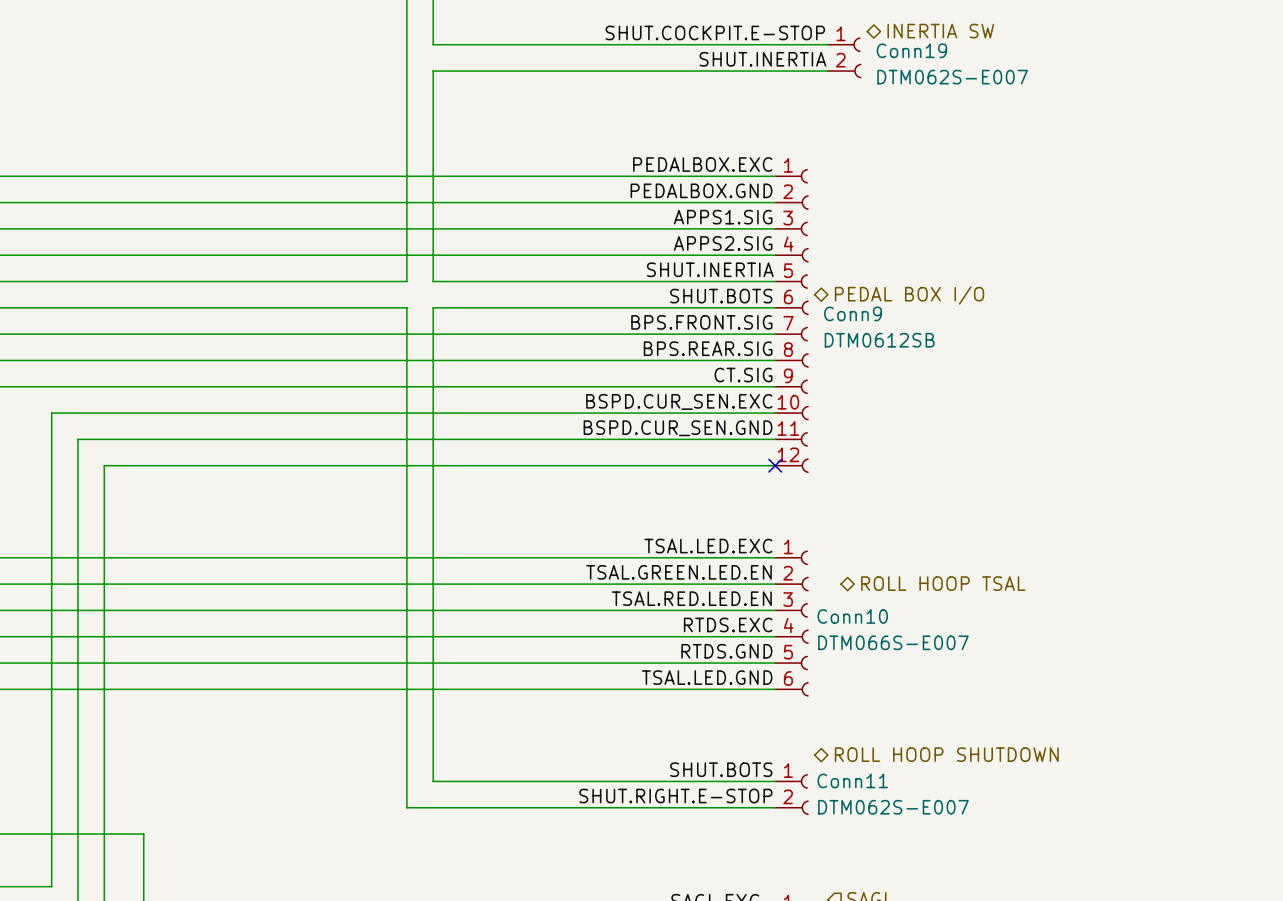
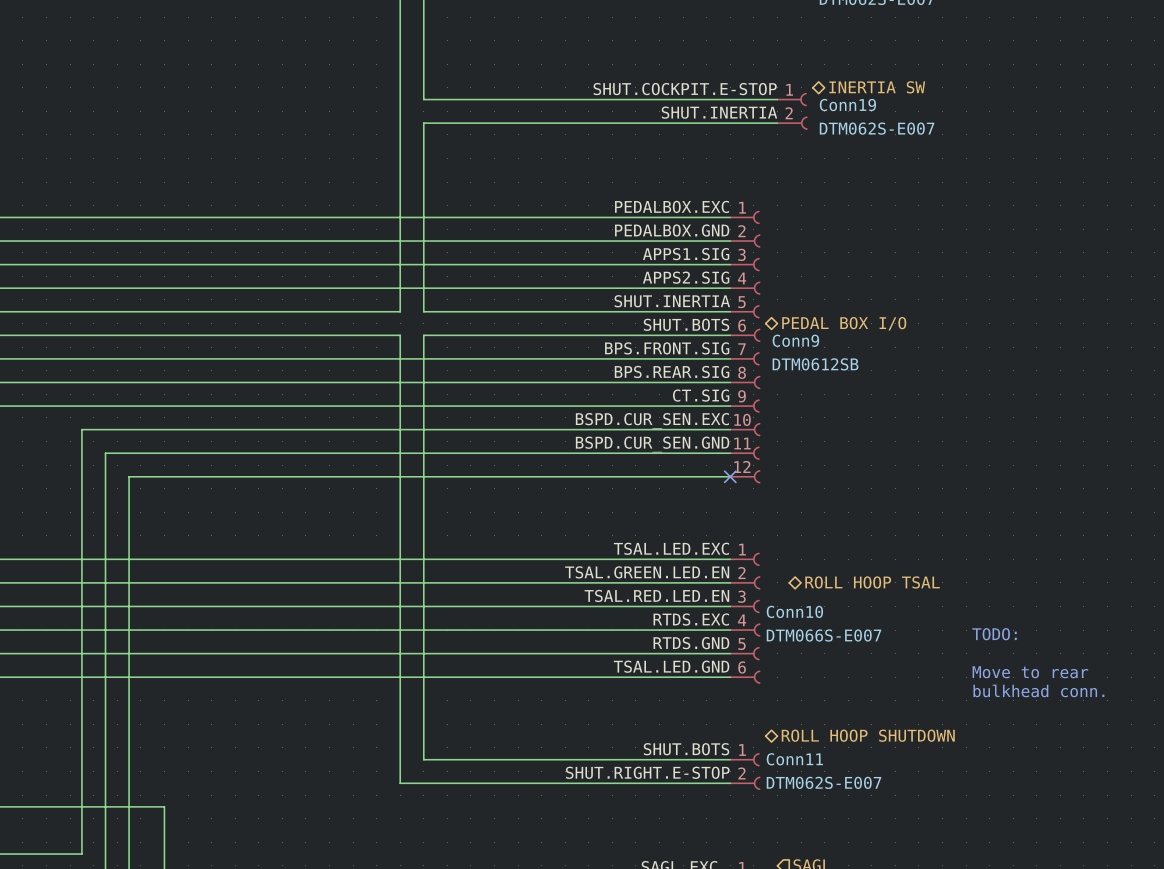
text: none -> TODO: (994, 634)
text: none -> Move to rear (1030, 672)
text: none -> bulkhead conn. (1038, 690)

